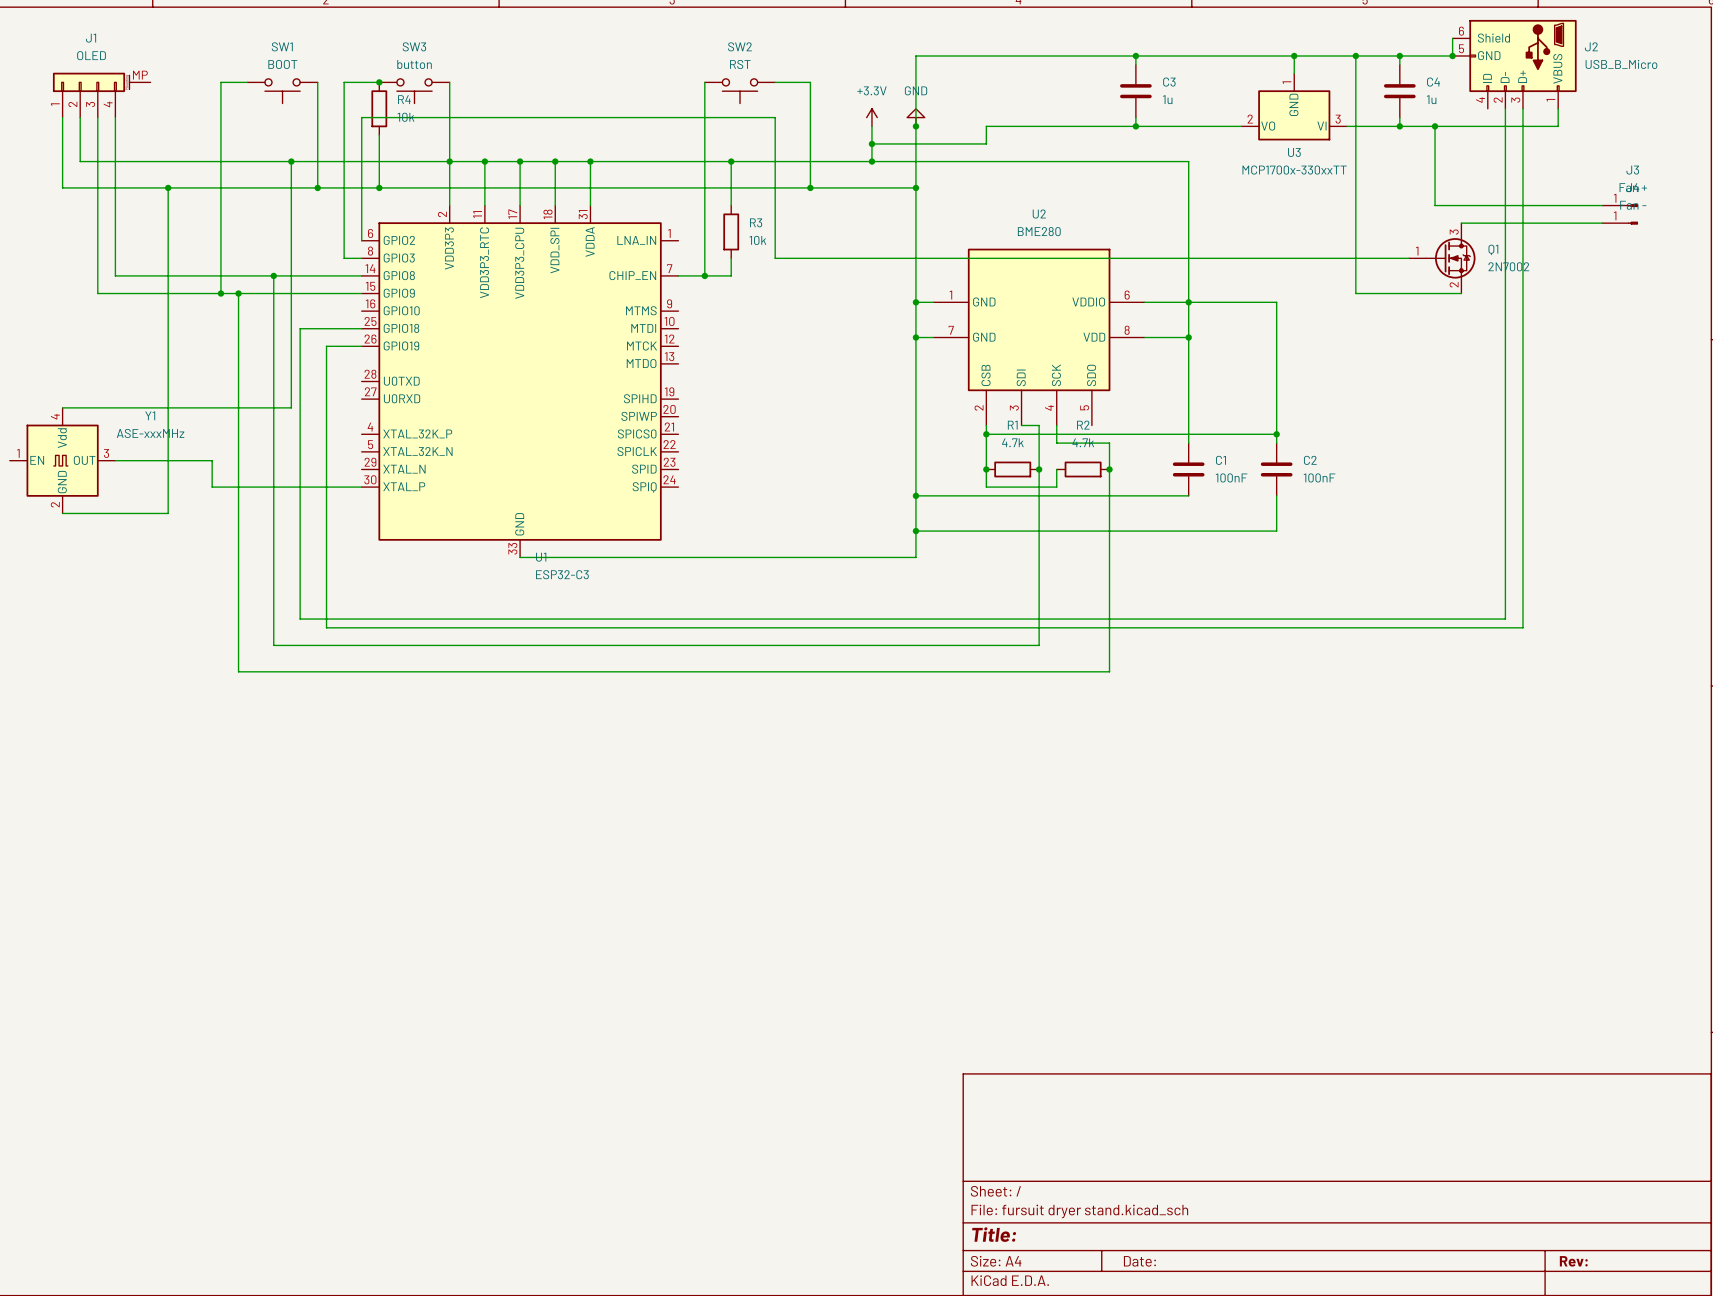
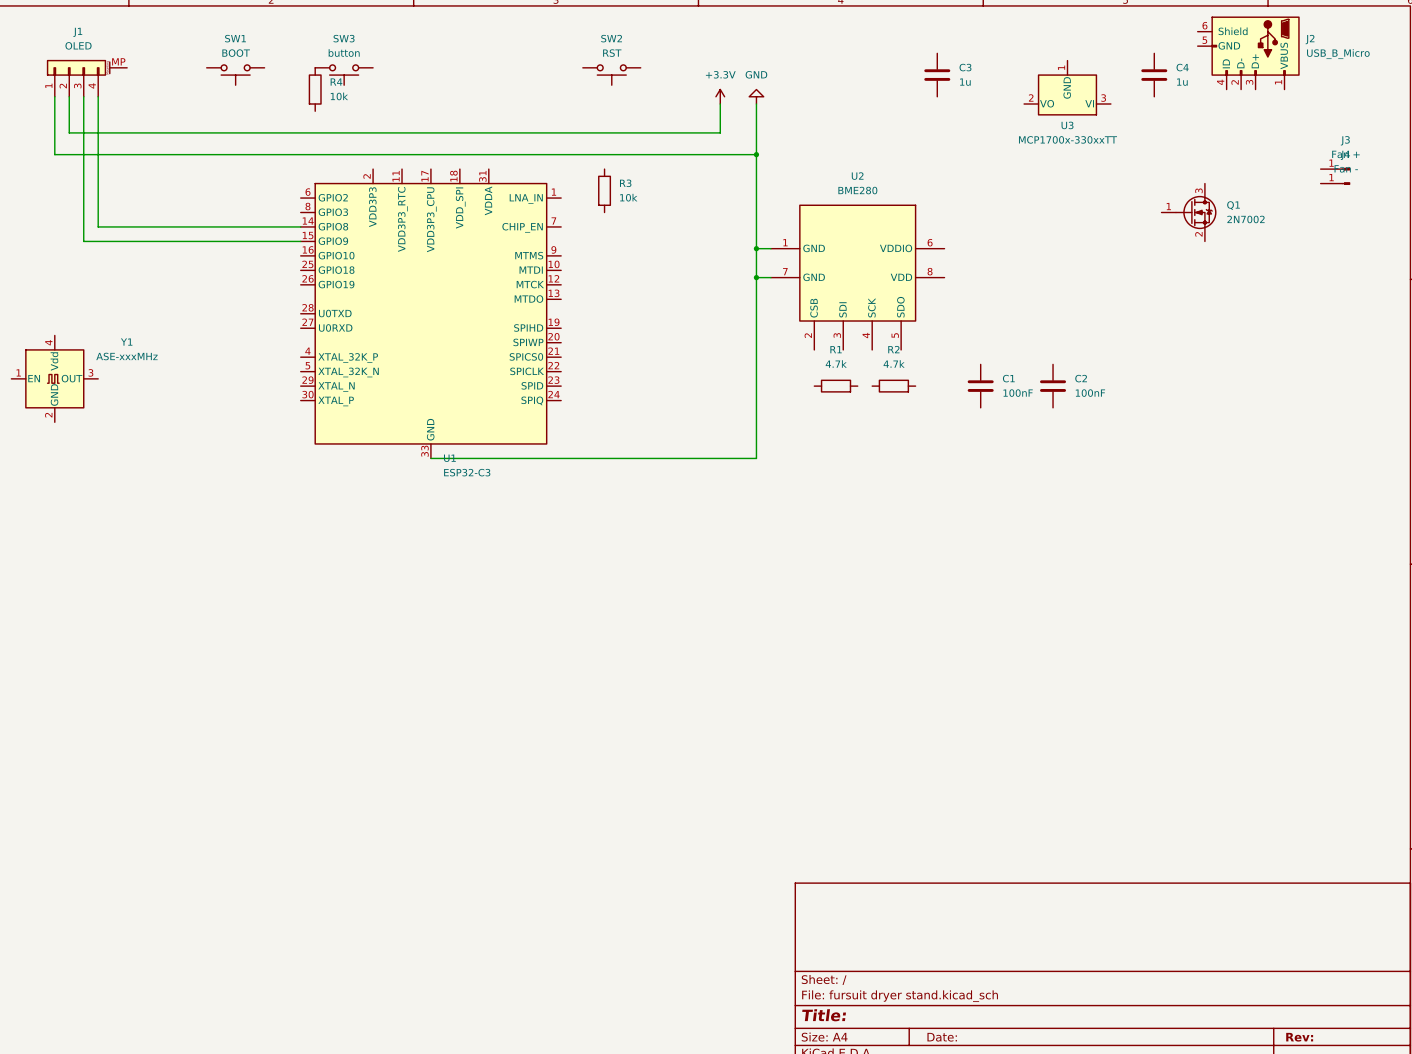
wire: (1452, 38) (1452, 55) (915, 55) (915, 126) -> none
wire: (1135, 55) (1135, 64) -> none
junction: (1135, 55) -> none
wire: (1294, 55) (1294, 73) -> none
junction: (1294, 55) -> none
wire: (1355, 55) (1355, 293) (1461, 293) -> none
junction: (1355, 55) -> none
wire: (1399, 55) (1399, 64) -> none
junction: (1399, 55) -> none
junction: (1452, 55) -> none
wire: (247, 82) (220, 82) (220, 293) -> none
wire: (317, 82) (317, 187) -> none
wire: (379, 82) (344, 82) (344, 258) (361, 258) -> none
junction: (379, 82) -> none
wire: (449, 82) (449, 205) -> none
wire: (704, 82) (704, 275) -> none
wire: (775, 82) (810, 82) (810, 187) -> none
wire: (1505, 108) (1505, 619) (300, 619) (300, 328) (361, 328) -> none
wire: (1522, 108) (1522, 627) (326, 627) (326, 346) (361, 346) -> none
wire: (1558, 108) (1558, 126) (1347, 126) -> none
wire: (1135, 117) (1135, 126) -> none
wire: (1399, 117) (1399, 126) -> none
junction: (915, 126) -> none
junction: (1135, 126) -> none
wire: (1241, 126) (986, 126) (986, 143) (871, 143) -> none
junction: (1399, 126) -> none
wire: (1435, 126) (1435, 205) (1602, 205) -> none
junction: (1435, 126) -> none
wire: (379, 135) (379, 187) -> none
junction: (871, 143) -> none
wire: (291, 161) (291, 407) (62, 407) -> none
junction: (291, 161) -> none
junction: (449, 161) -> none
wire: (484, 161) (484, 205) -> none
junction: (484, 161) -> none
wire: (520, 161) (520, 205) -> none
junction: (520, 161) -> none
wire: (555, 161) (555, 205) -> none
junction: (555, 161) -> none
wire: (590, 161) (590, 205) -> none
junction: (590, 161) -> none
wire: (731, 161) (731, 205) -> none
junction: (731, 161) -> none
wire: (871, 161) (1188, 161) (1188, 443) -> none
junction: (871, 161) -> none
wire: (168, 187) (168, 513) (62, 513) -> none
junction: (168, 187) -> none
junction: (317, 187) -> none
junction: (379, 187) -> none
junction: (810, 187) -> none
wire: (1461, 223) (1602, 223) -> none
wire: (361, 240) (361, 117) (775, 117) (775, 258) (1408, 258) -> none
wire: (731, 258) (731, 275) (678, 275) -> none
wire: (273, 275) (273, 645) (1039, 645) (1039, 425) (1021, 425) -> none
junction: (273, 275) -> none
junction: (704, 275) -> none
junction: (220, 293) -> none
wire: (238, 293) (238, 671) (1109, 671) (1109, 443) (1056, 443) (1056, 425) -> none
junction: (238, 293) -> none
wire: (1144, 302) (1276, 302) (1276, 443) -> none
junction: (1188, 302) -> none
wire: (1144, 337) (1188, 337) -> none
junction: (1188, 337) -> none
wire: (986, 425) (986, 487) (1056, 487) (1056, 469) -> none
wire: (986, 434) (1276, 434) -> none
junction: (986, 434) -> none
junction: (1276, 434) -> none
wire: (115, 460) (212, 460) (212, 487) (361, 487) -> none
junction: (986, 469) -> none
junction: (1039, 469) -> none
junction: (1109, 469) -> none
wire: (915, 495) (1188, 495) -> none
junction: (915, 495) -> none
wire: (1276, 495) (1276, 531) (915, 531) -> none
junction: (915, 531) -> none

